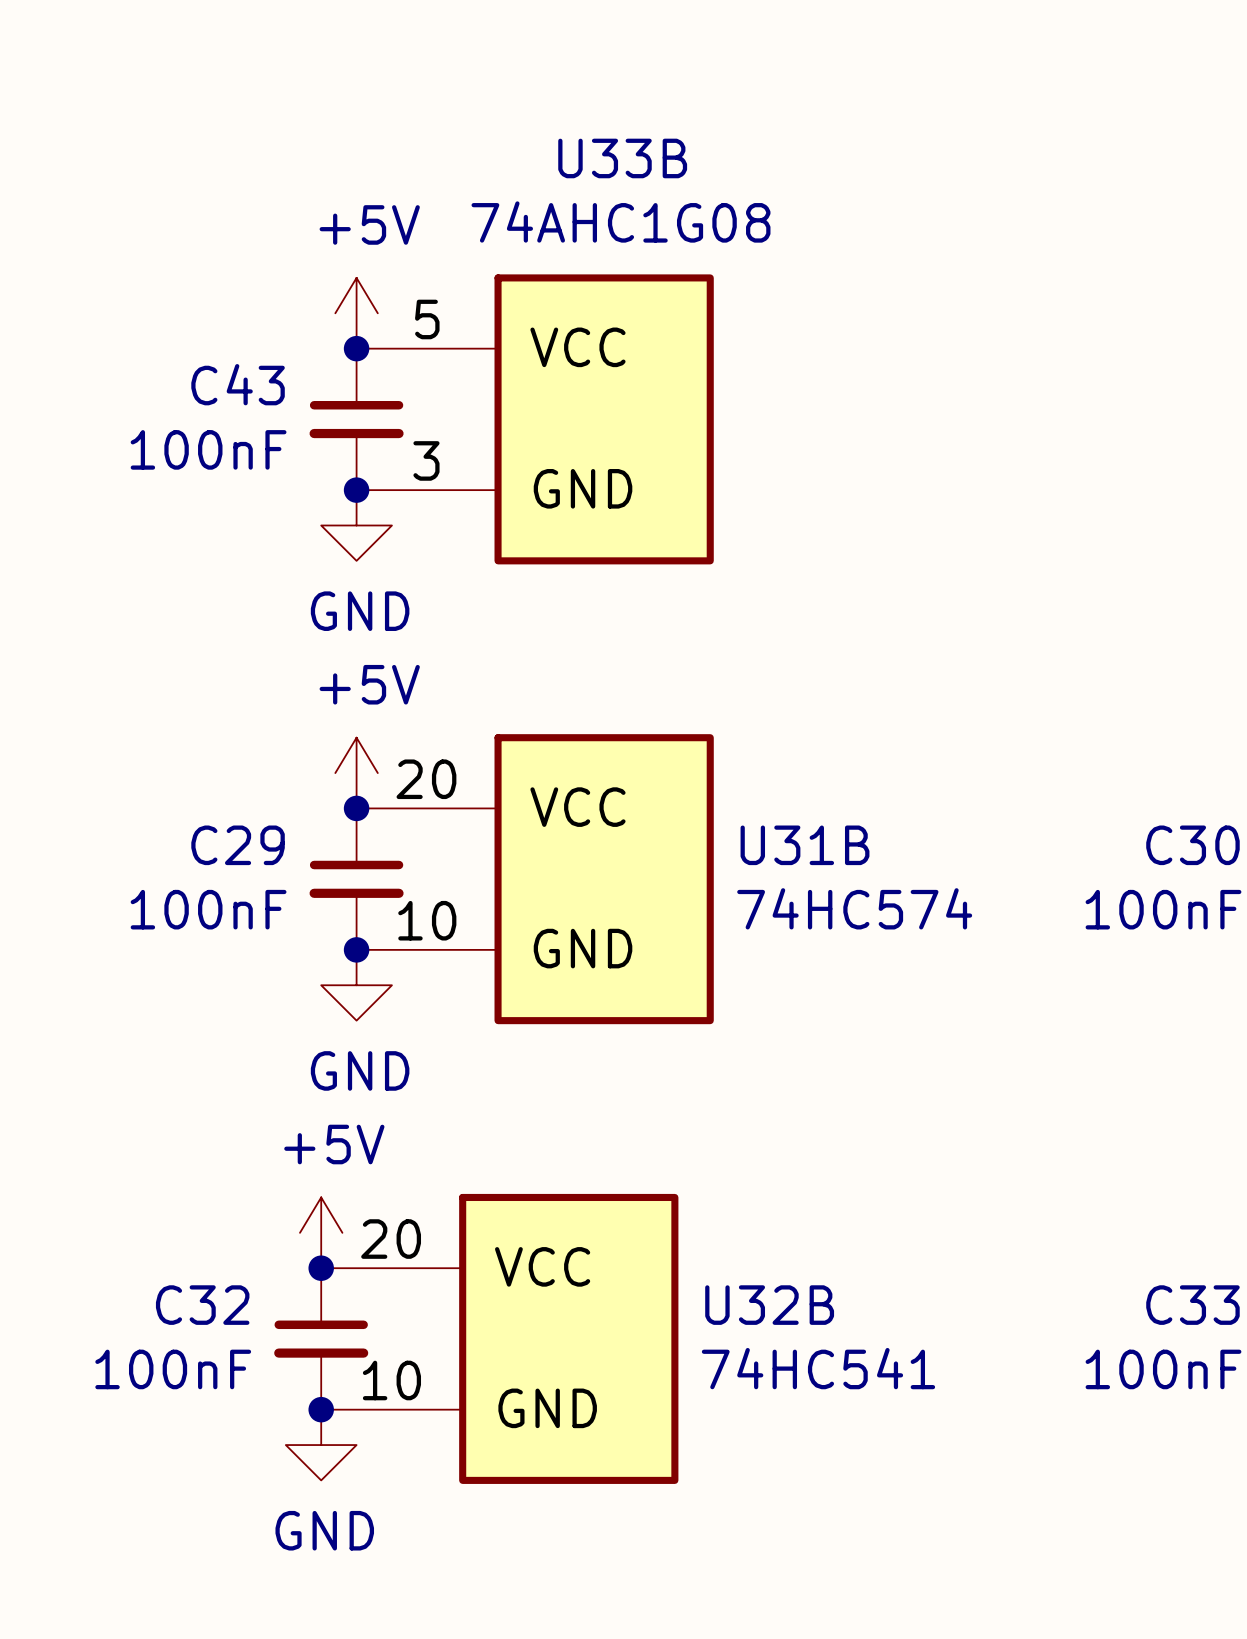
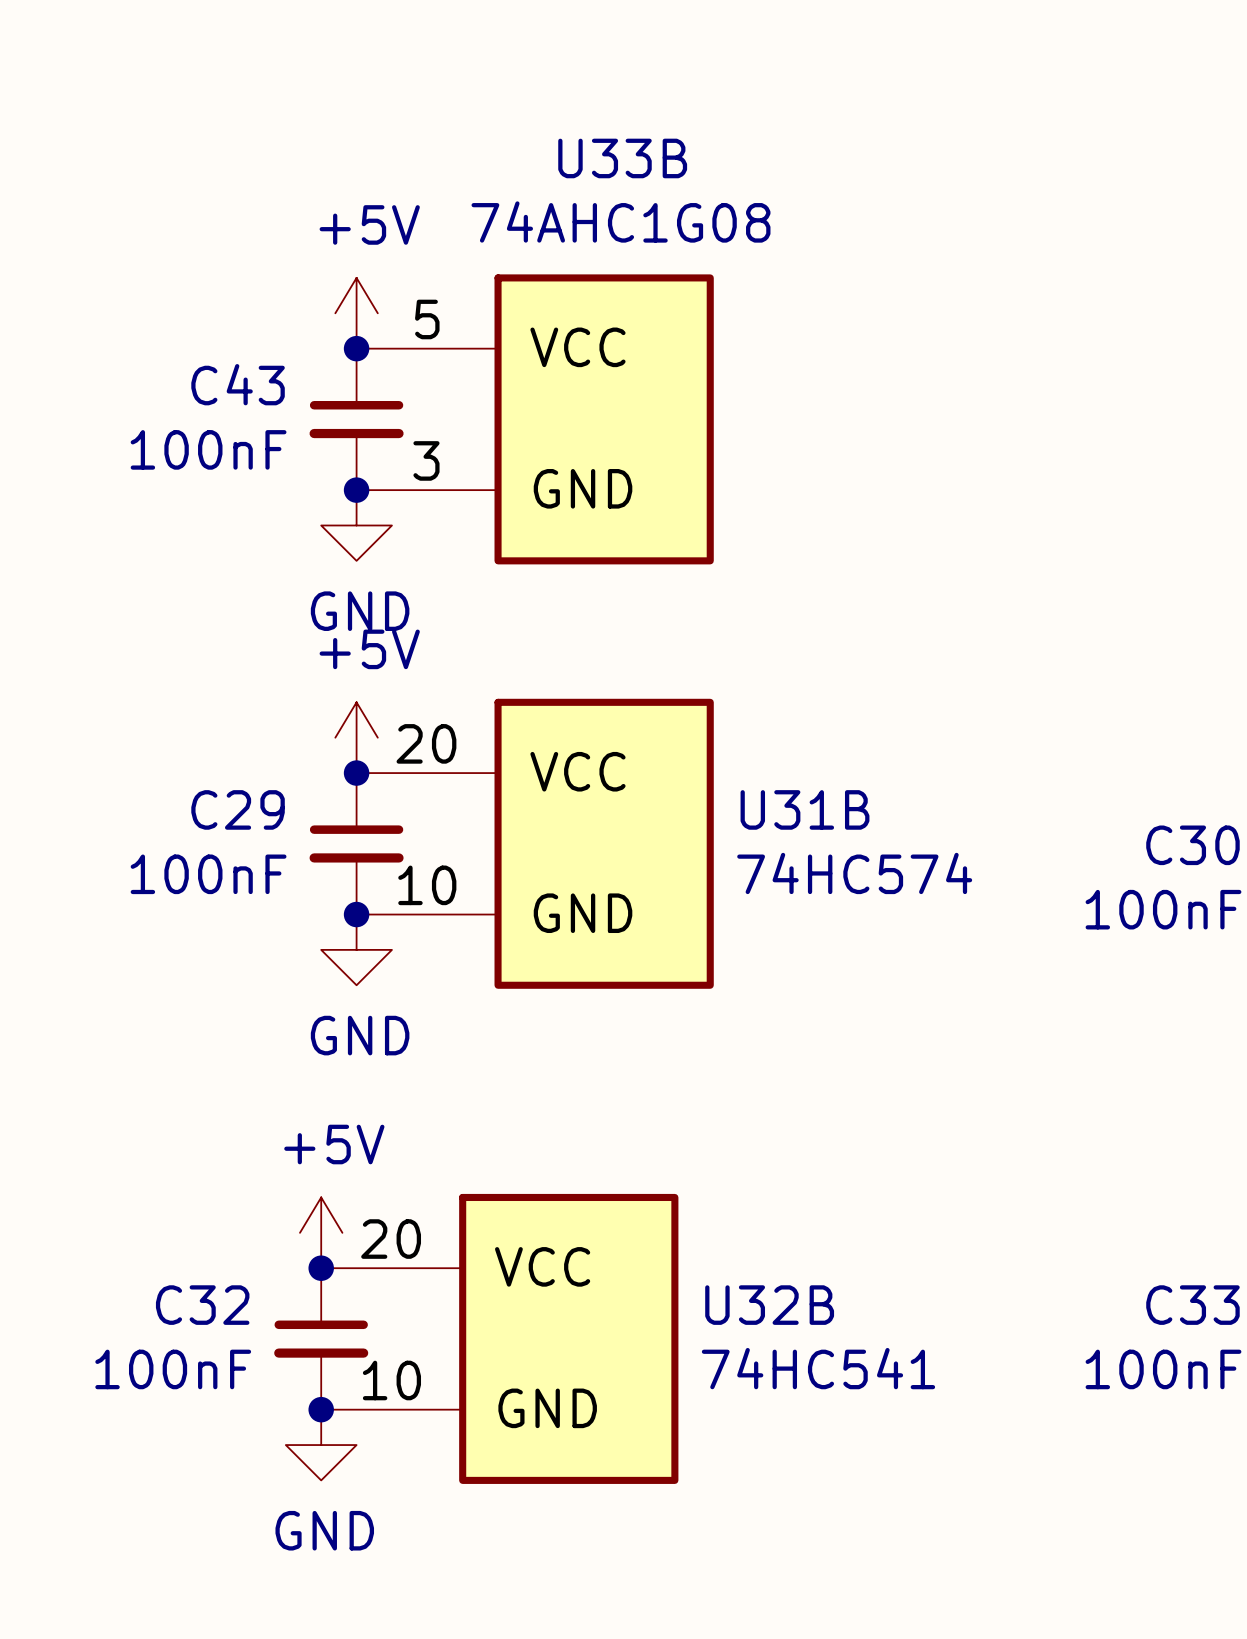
power symbol position: +5V (356, 773) -> +5V (356, 737)
junction position: (356, 808) -> (356, 773)
C29 position: (356, 879) -> (356, 843)
U31B position: (535, 879) -> (535, 843)
junction position: (356, 949) -> (356, 914)
power symbol position: GND (356, 985) -> GND (356, 949)

